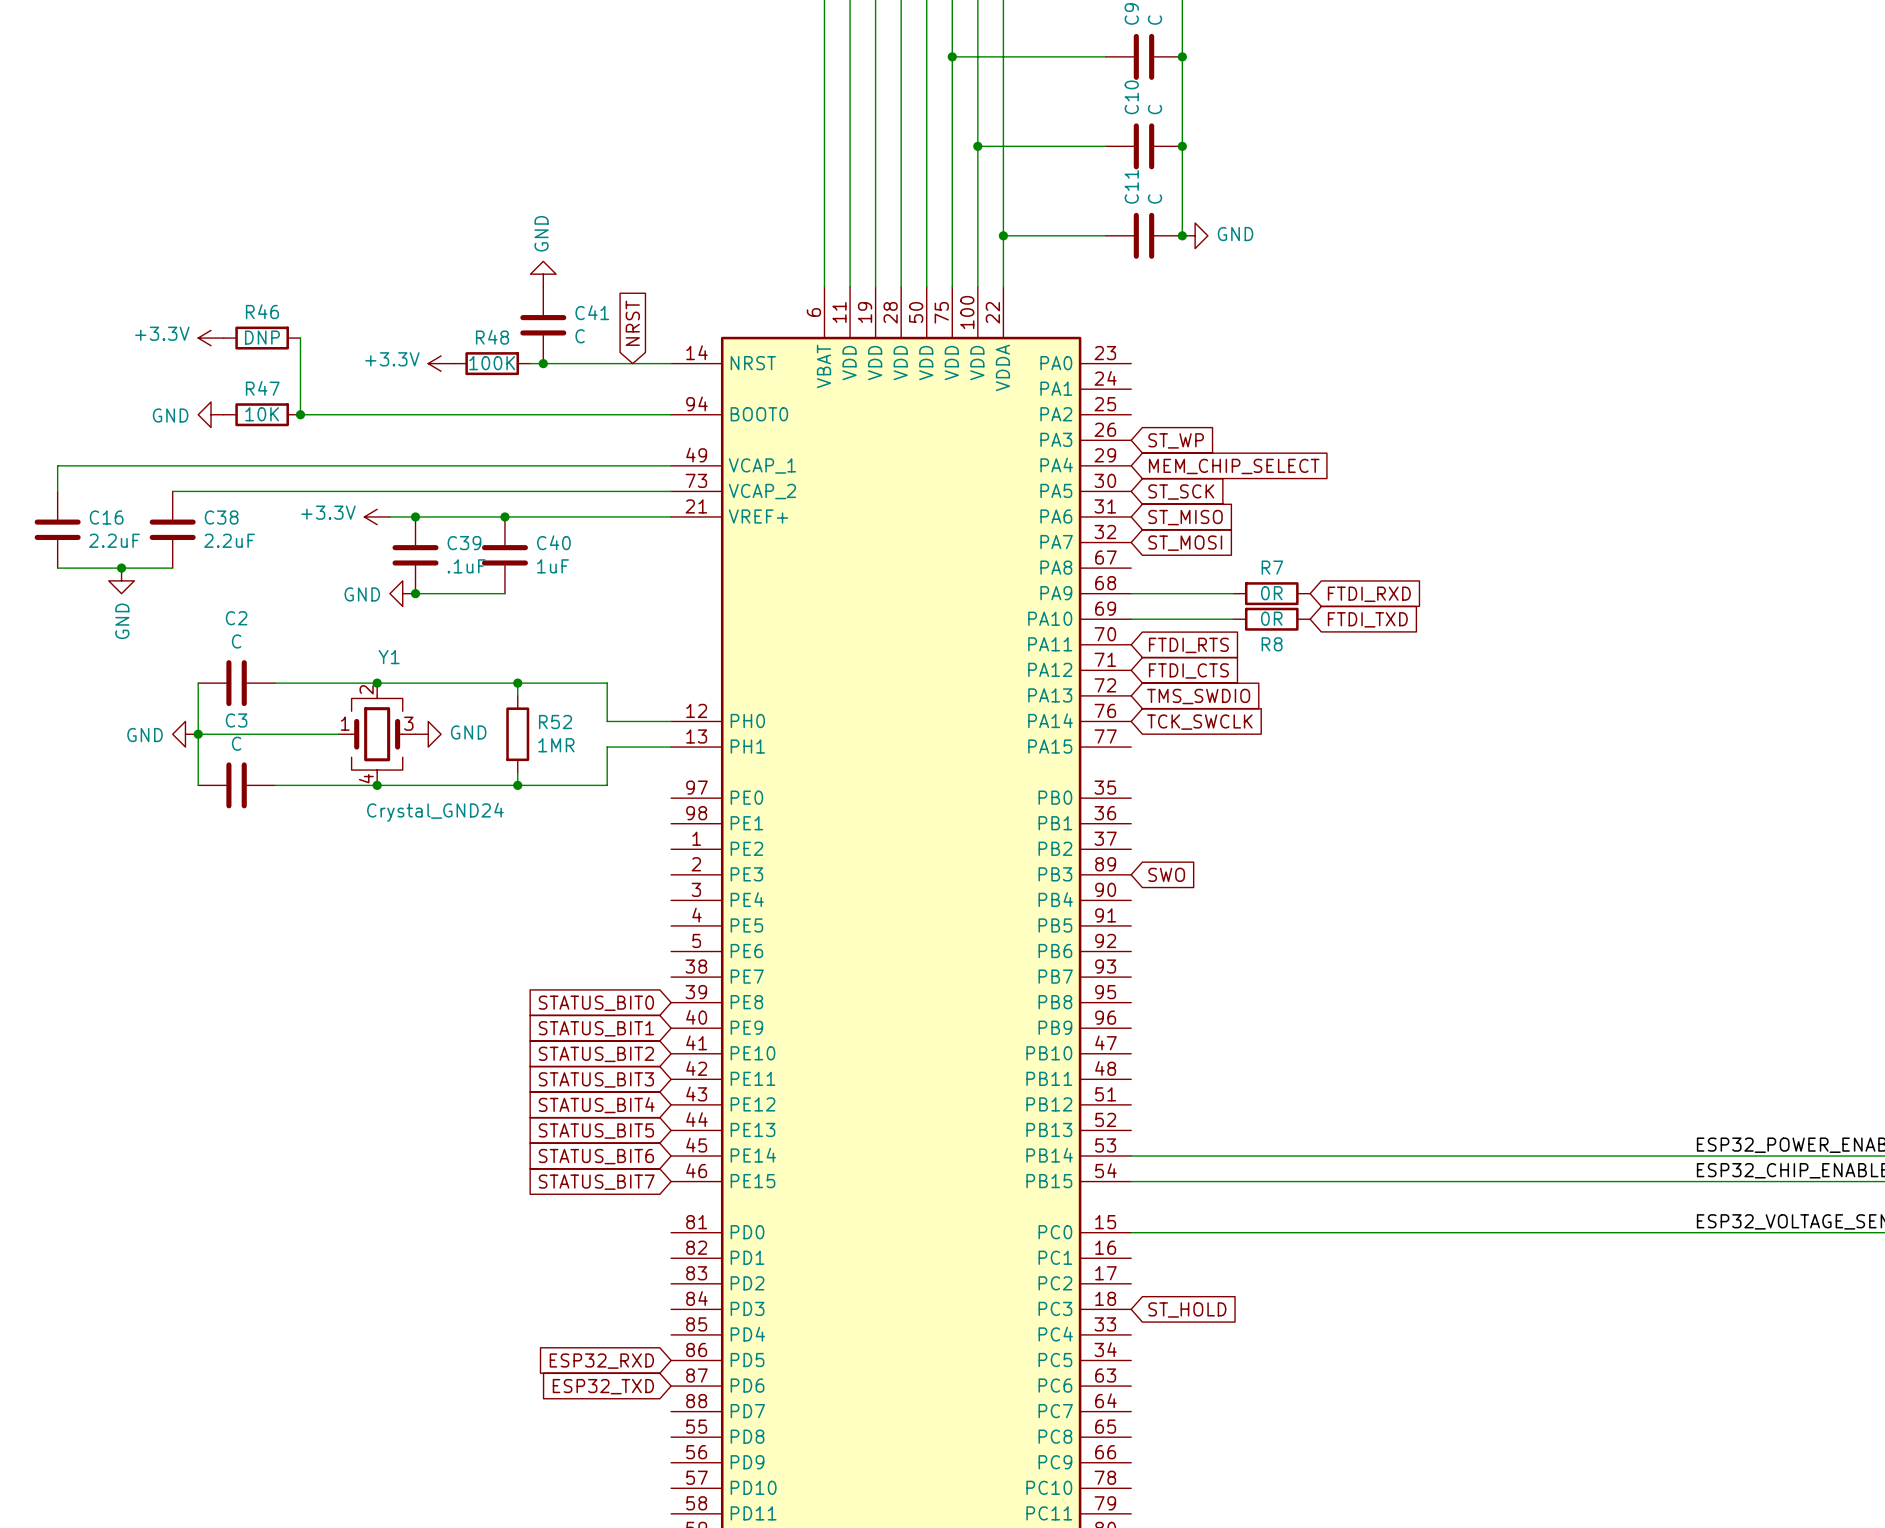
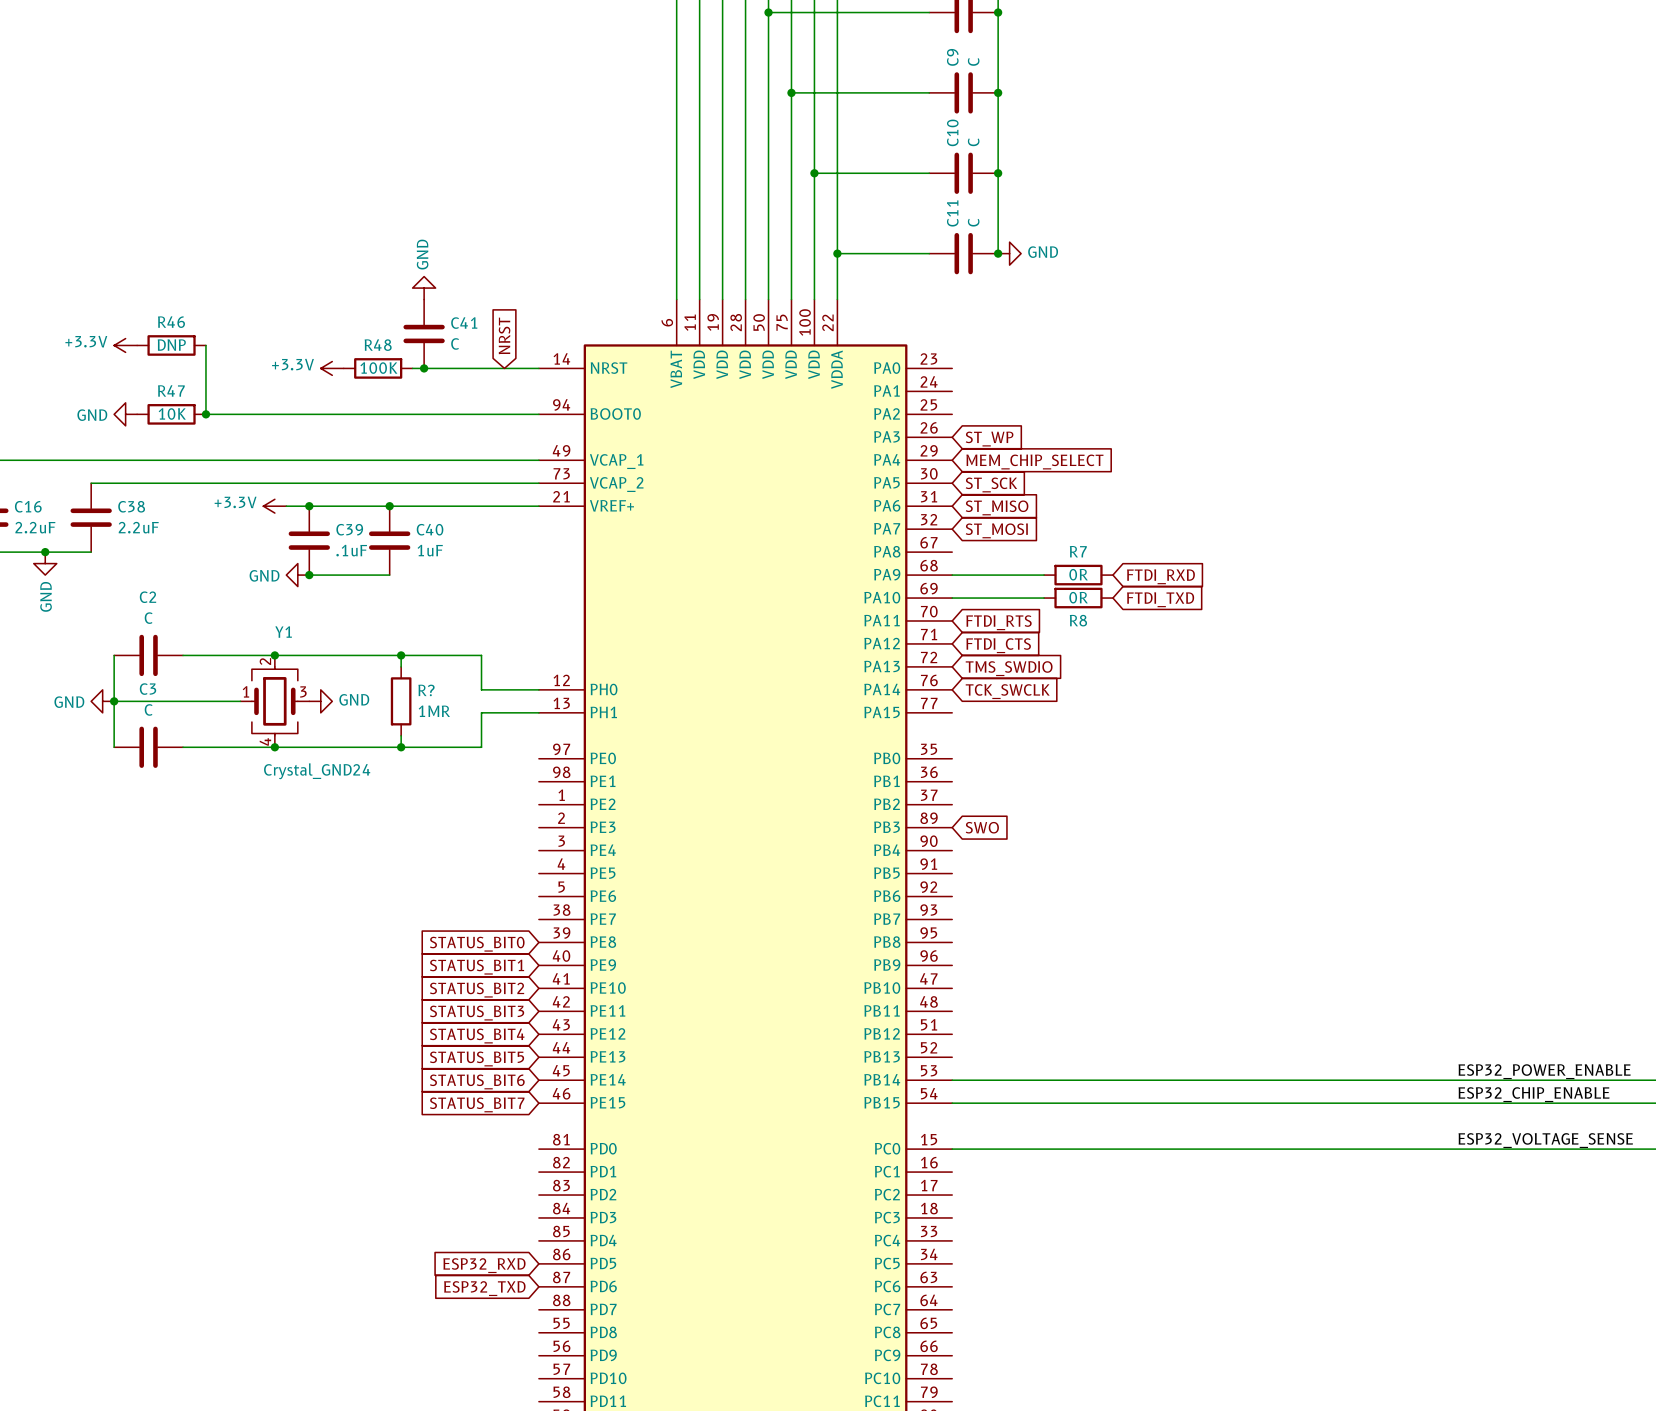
R52 name: R52 (555, 722) -> R? (426, 690)
global label: ST_HOLD (1187, 1309) -> none

